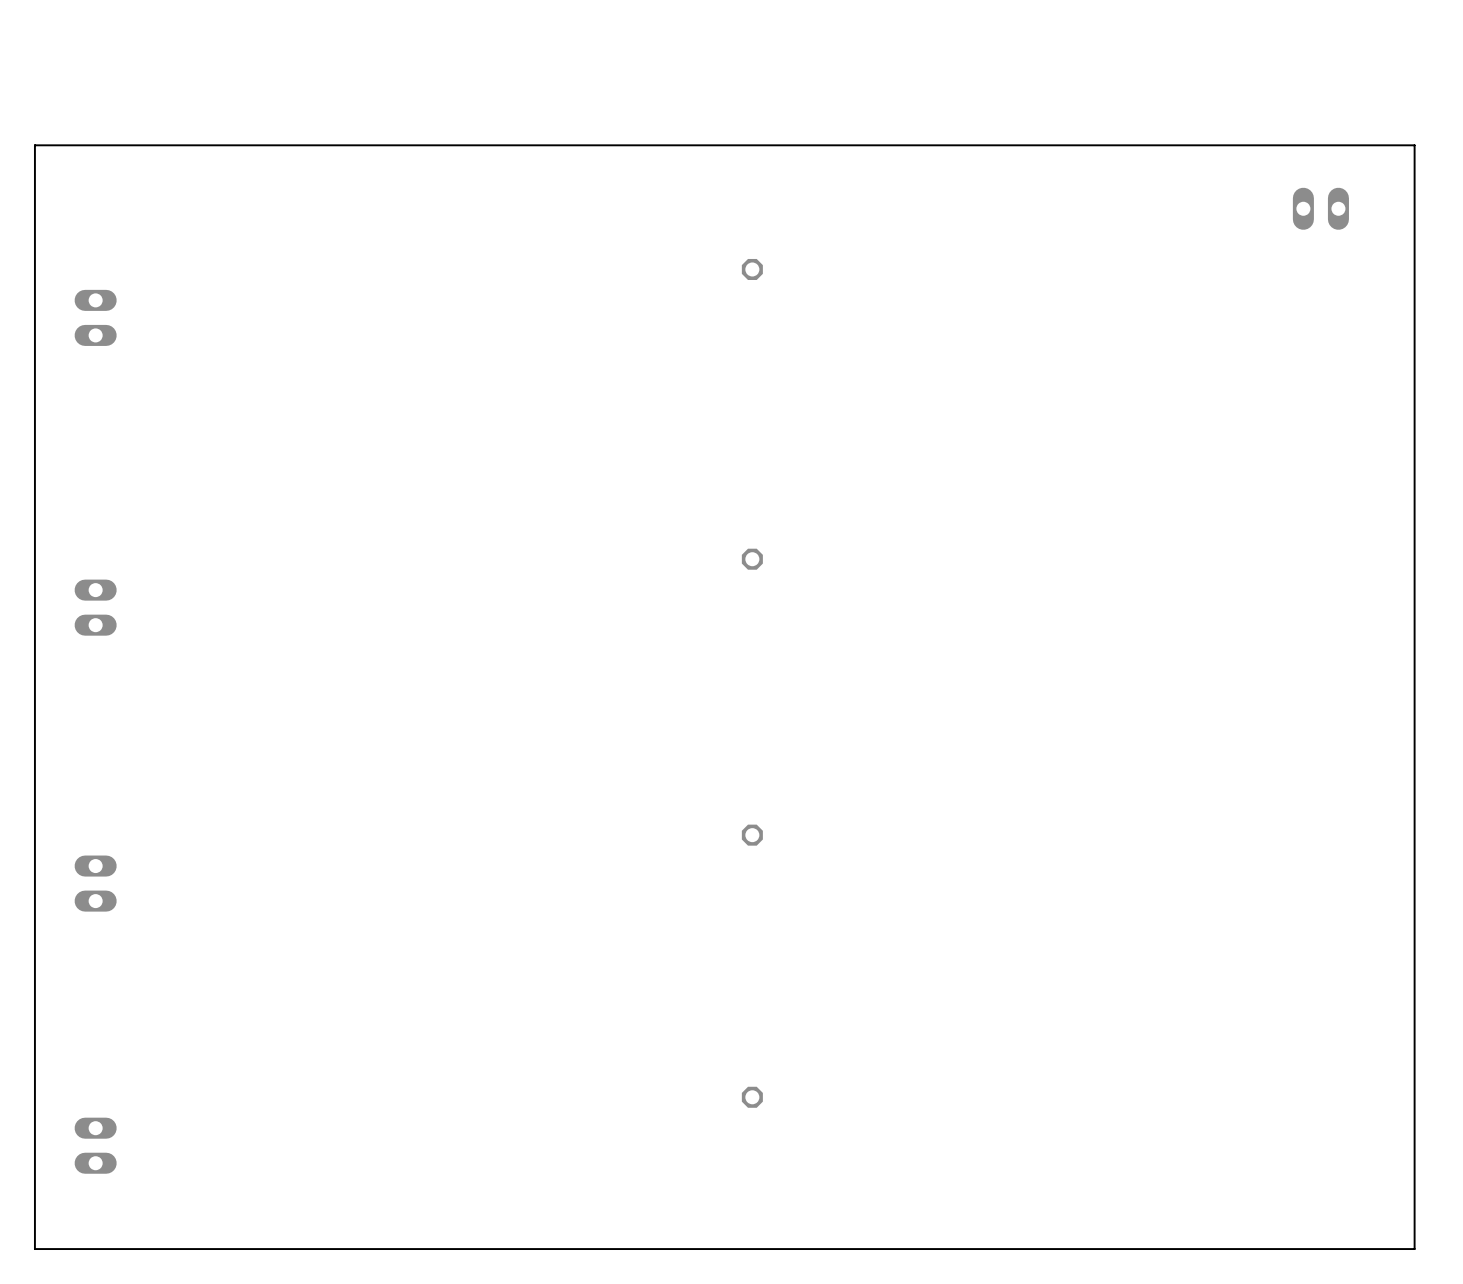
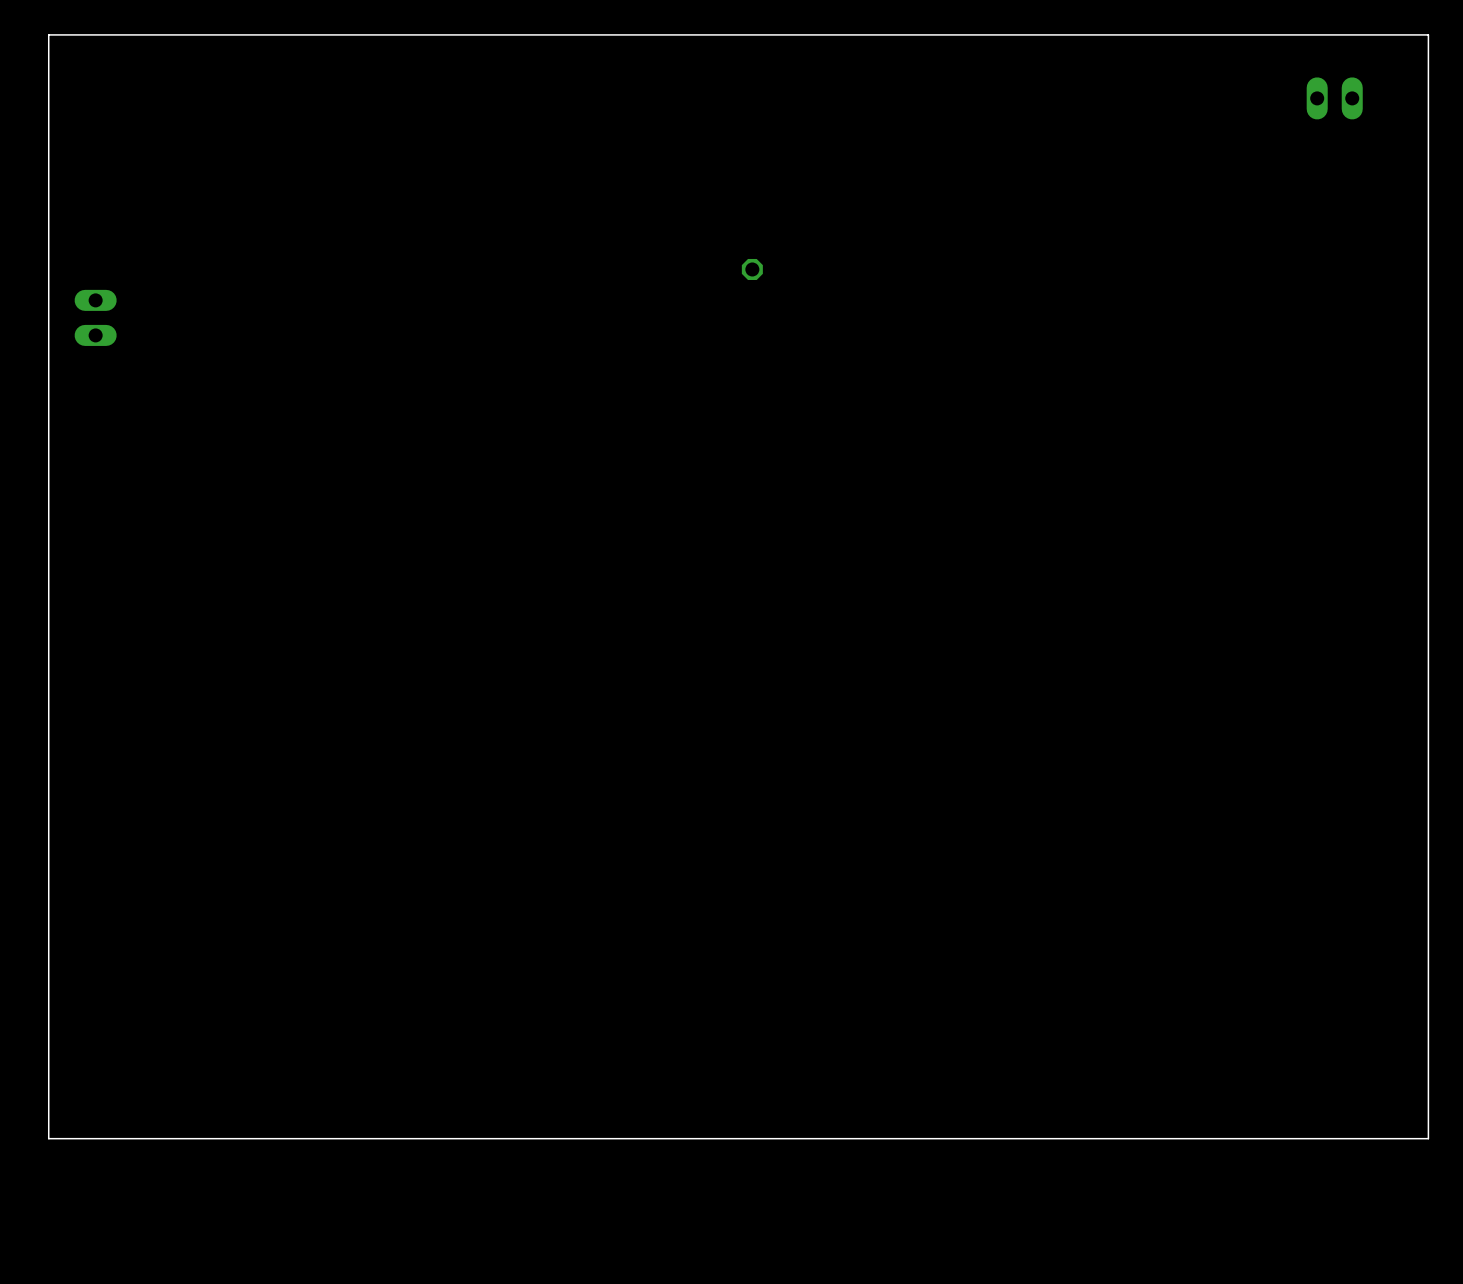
board edge: (1414, 145) (34, 145) (34, 1249) (1414, 1249) (1414, 145) -> (1428, 34) (48, 34) (48, 1138) (1428, 1138) (1428, 34)
part position: (1320, 208) -> (1334, 98)
part: (752, 559) -> none
part: (95, 607) -> none
part: (752, 835) -> none
part: (95, 883) -> none
part: (752, 1097) -> none
part: (95, 1145) -> none

